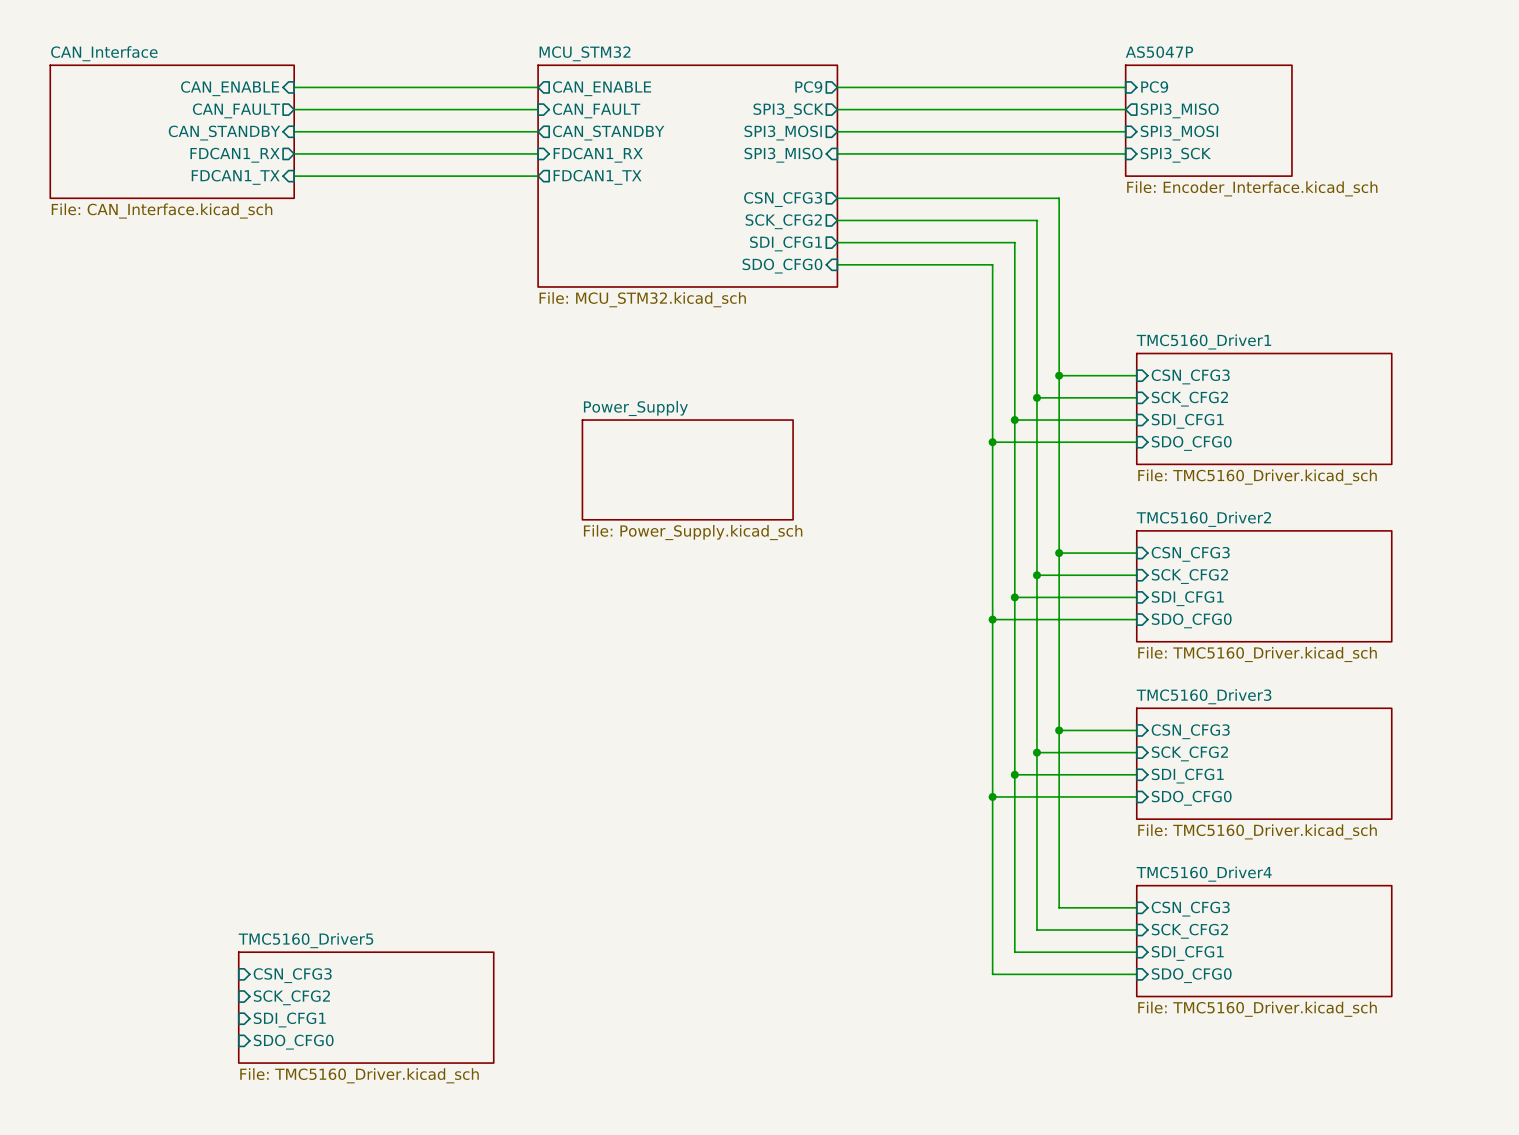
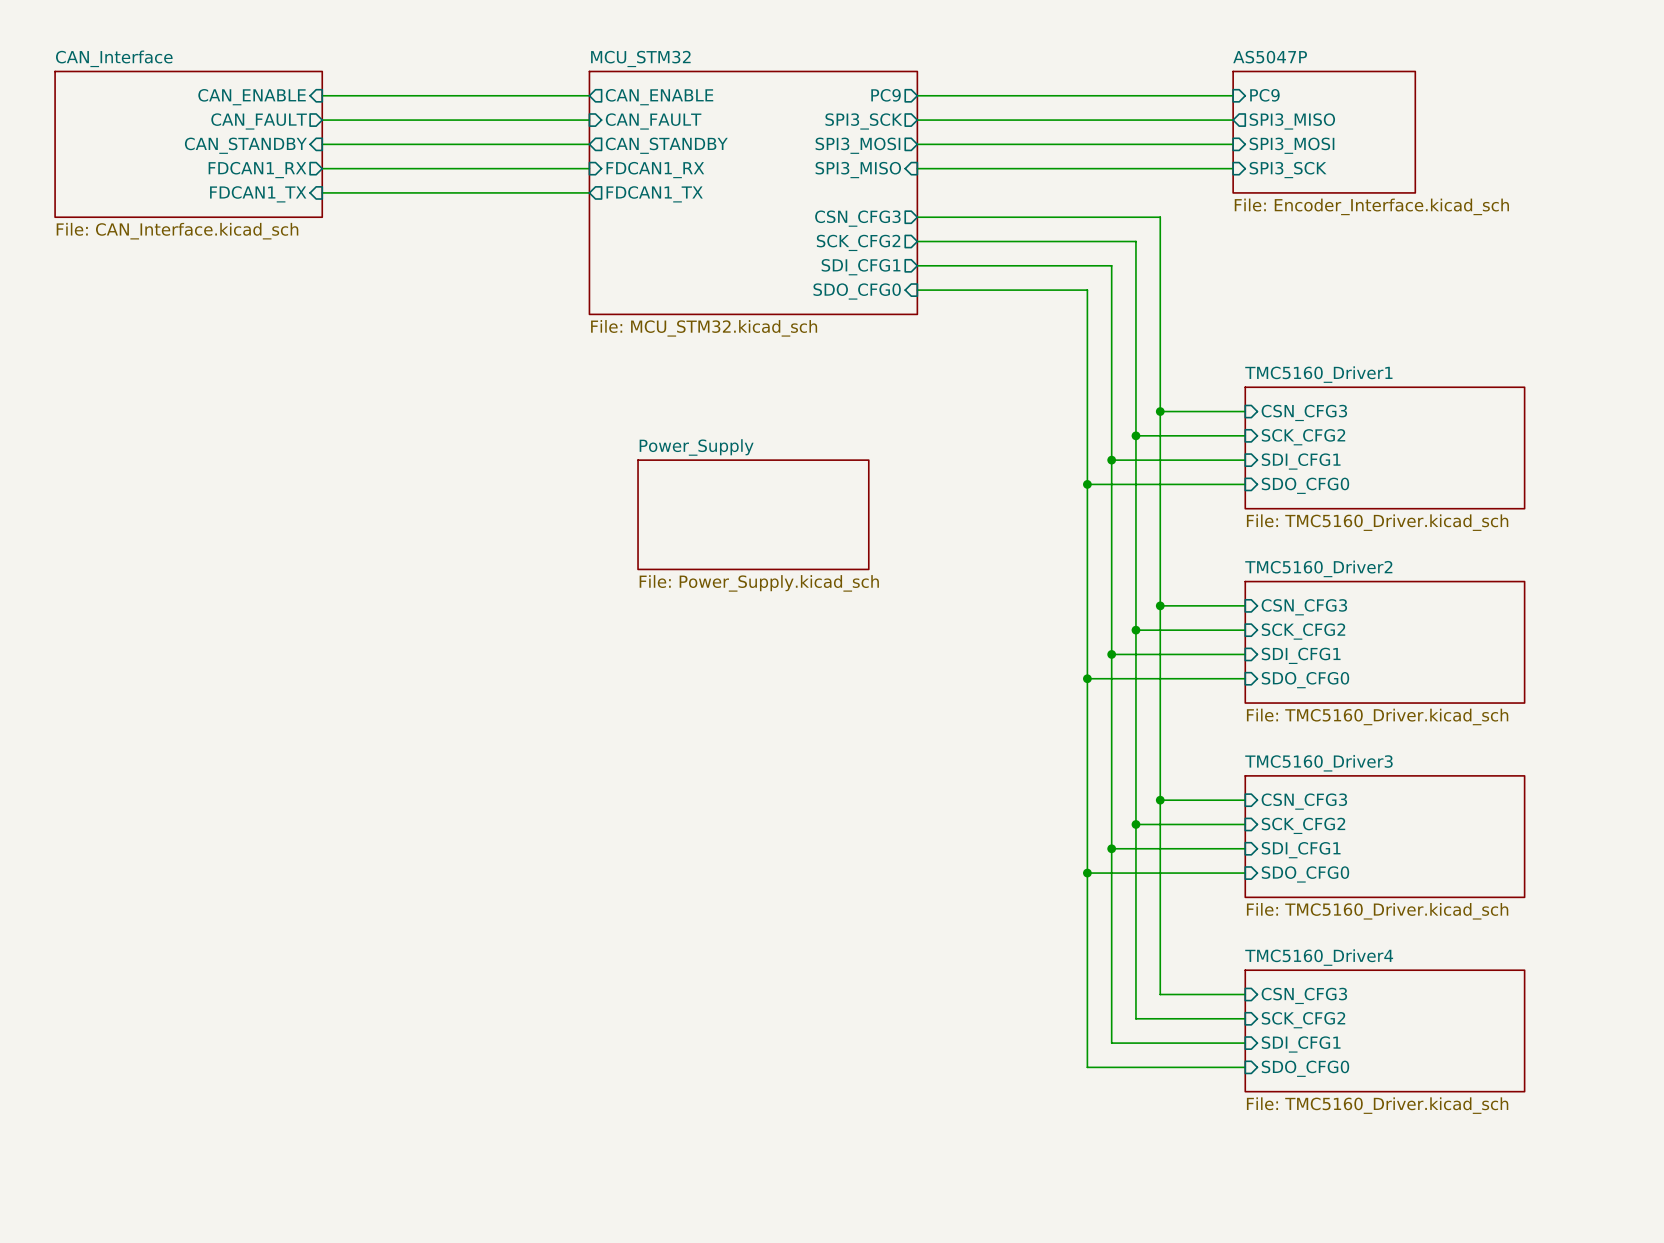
sheet pin: CSN_CFG3 (292, 975) -> none
sheet pin: SCK_CFG2 (291, 997) -> none
sheet TMC5160_Driver5: File: TMC5160_Driver.kicad_sch (366, 1007) -> none
sheet pin: SDI_CFG1 (289, 1019) -> none
sheet pin: SDO_CFG0 (293, 1042) -> none

